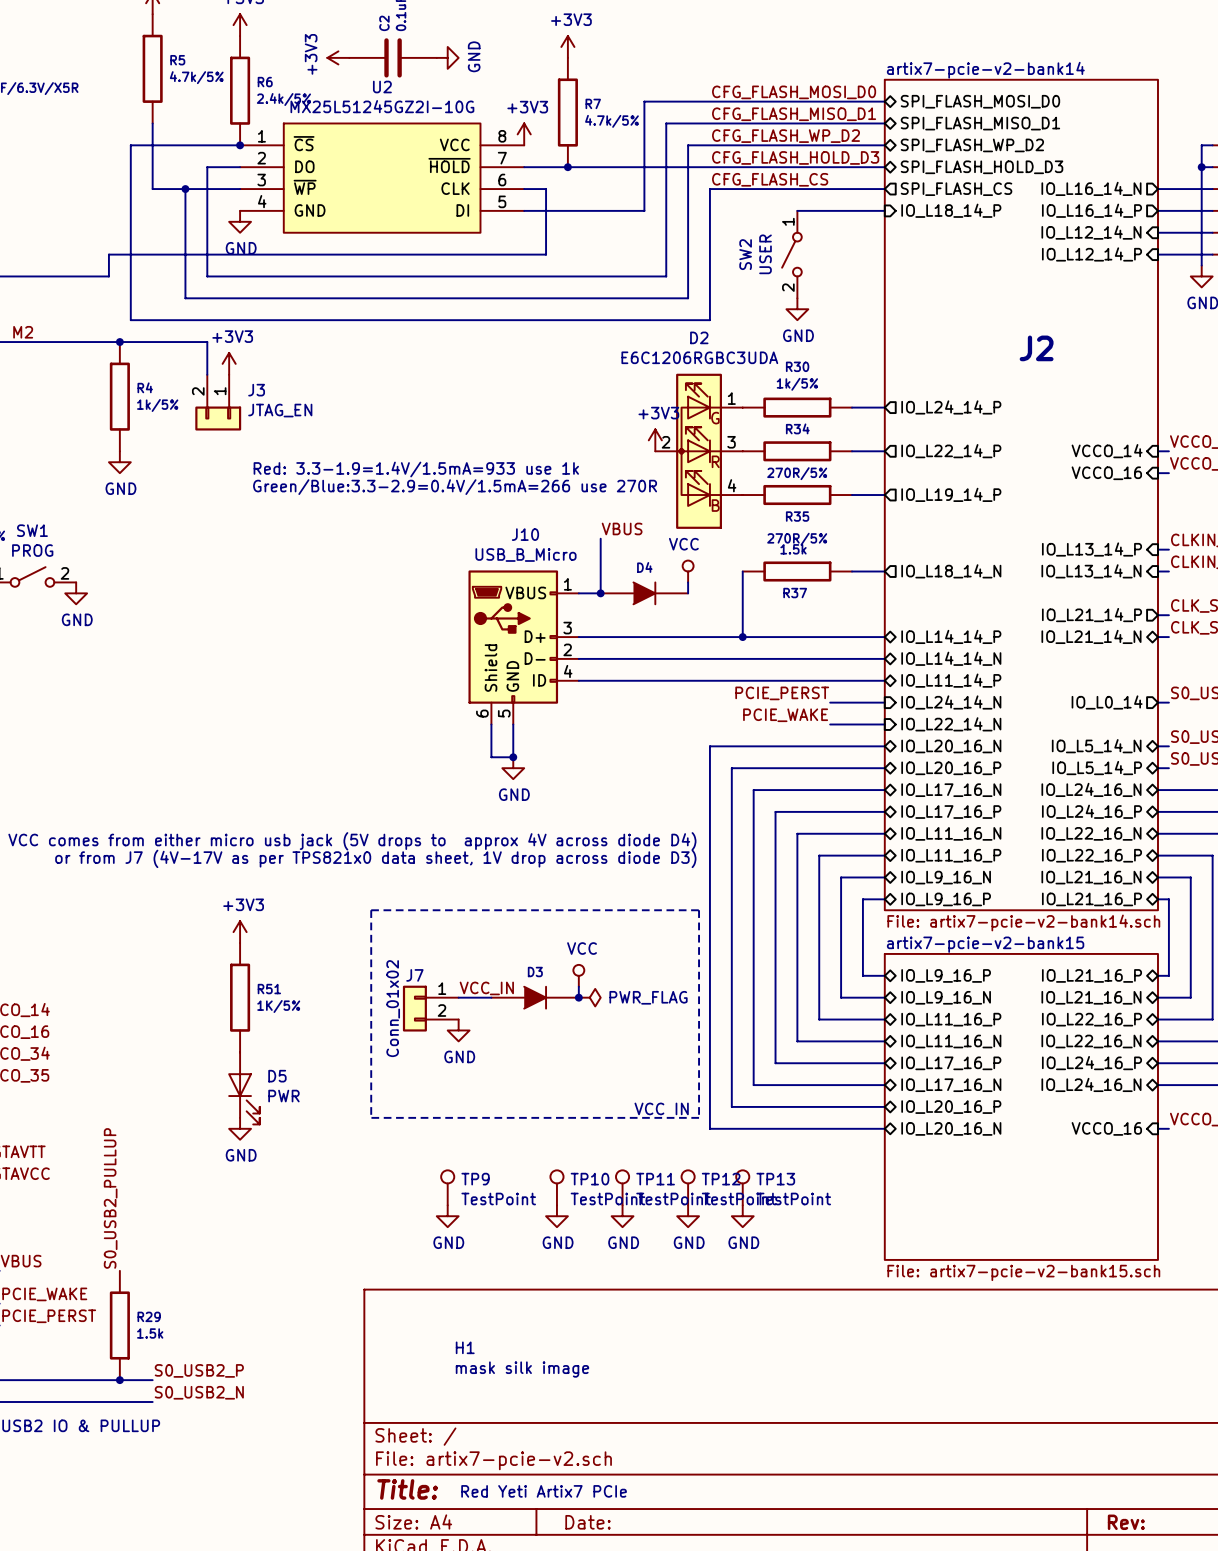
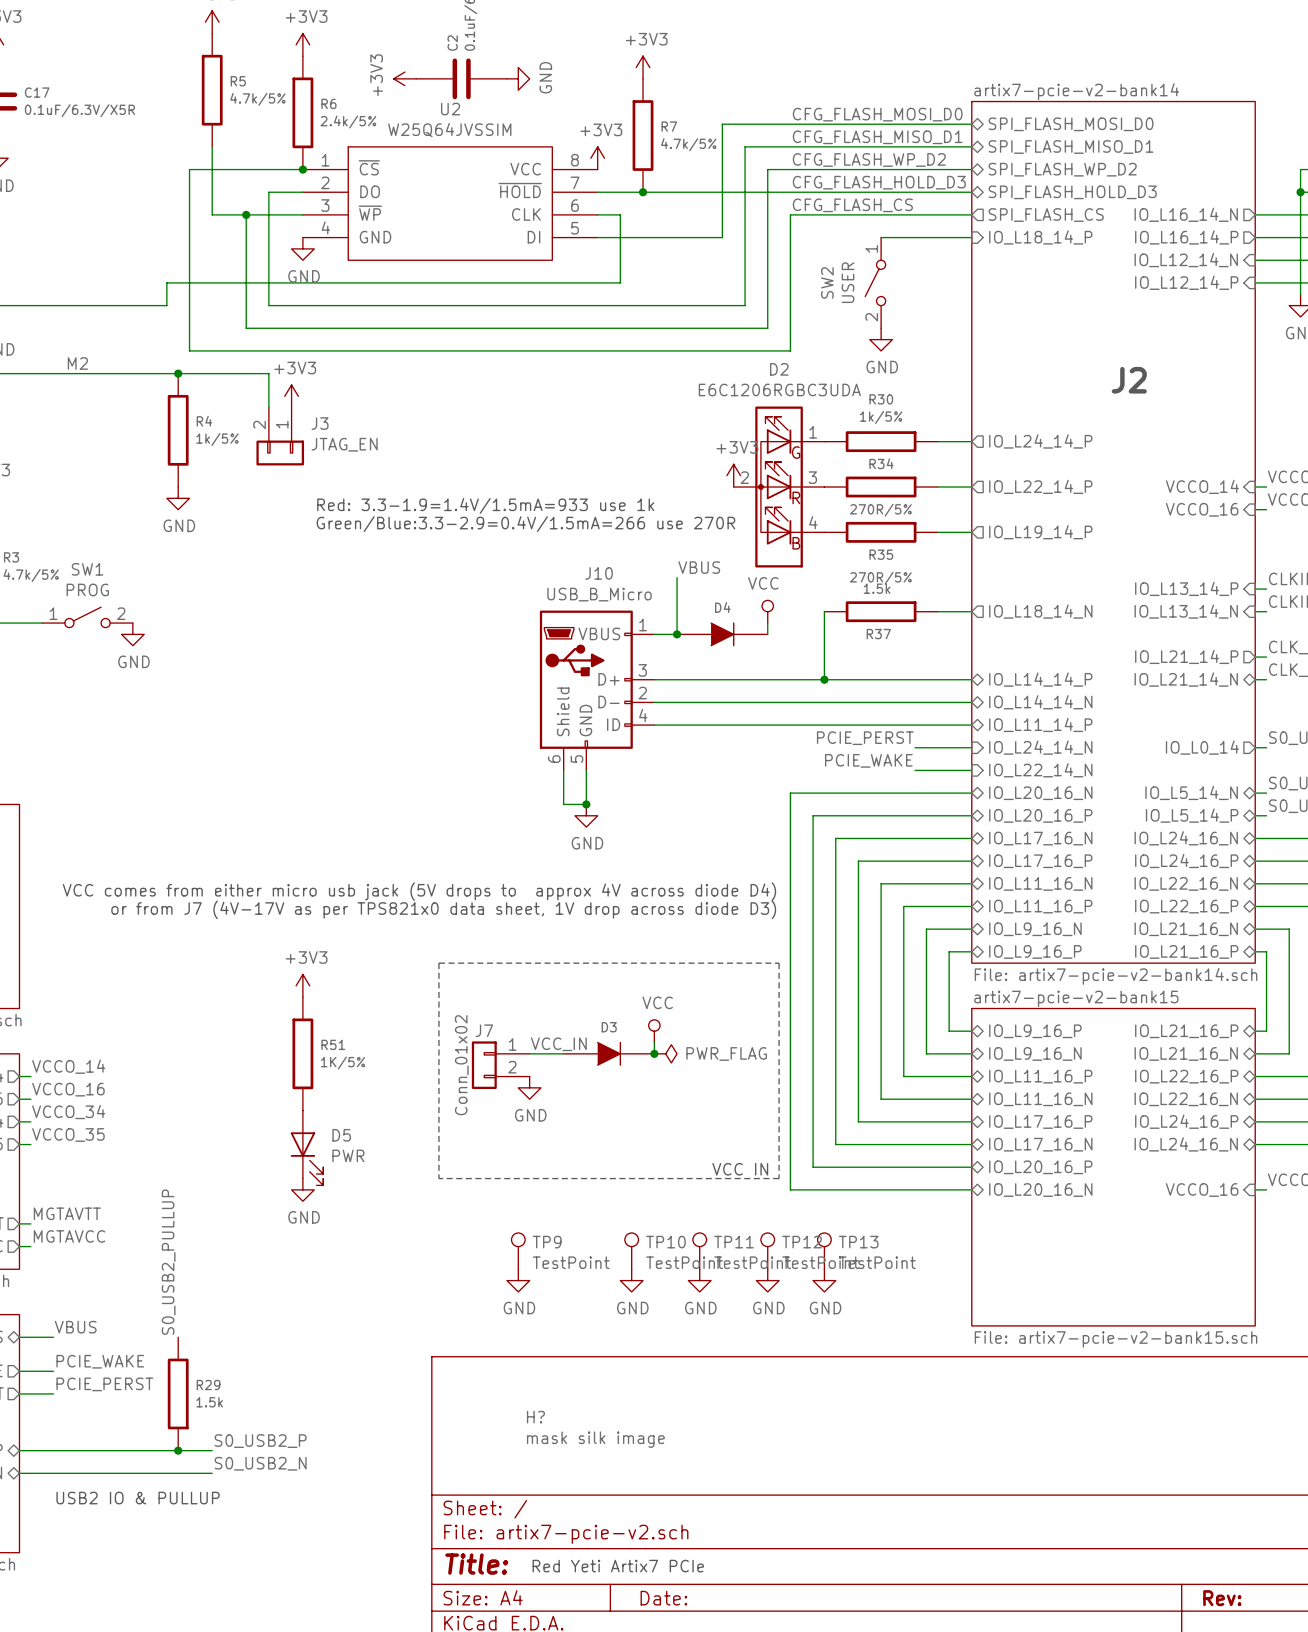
U2 value: MX25L51245GZ2I-10G (382, 106) -> W25Q64JVSSIM (449, 129)
H1 name: H1 (465, 1347) -> H? (535, 1417)

